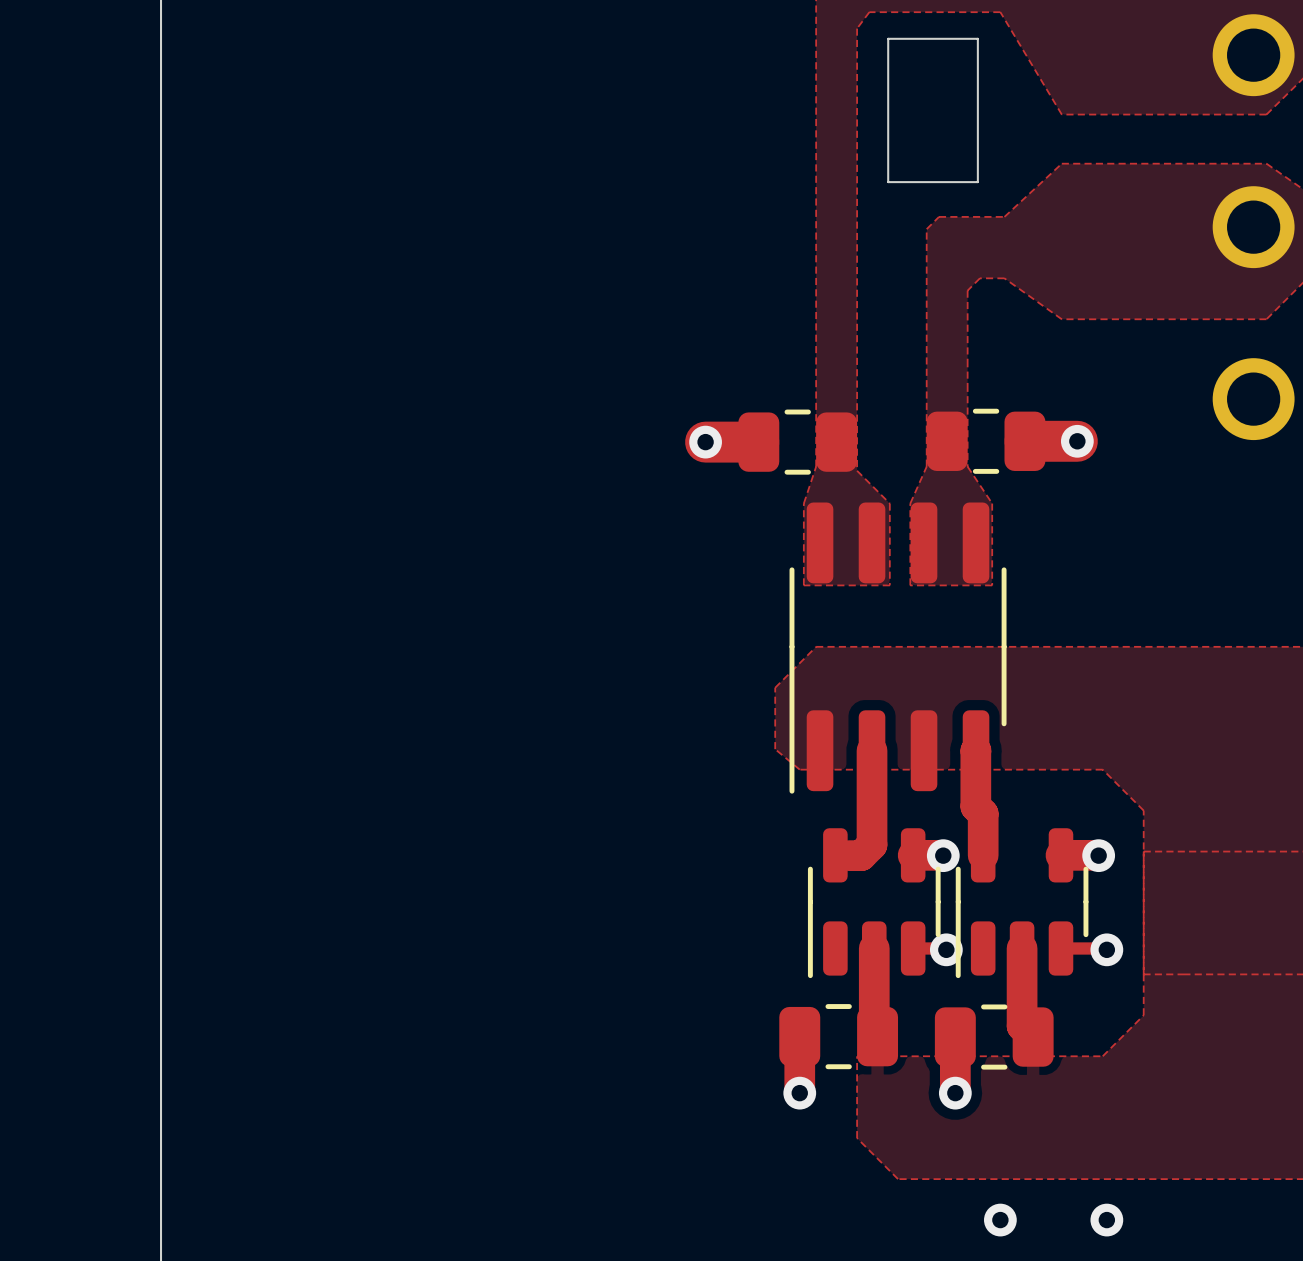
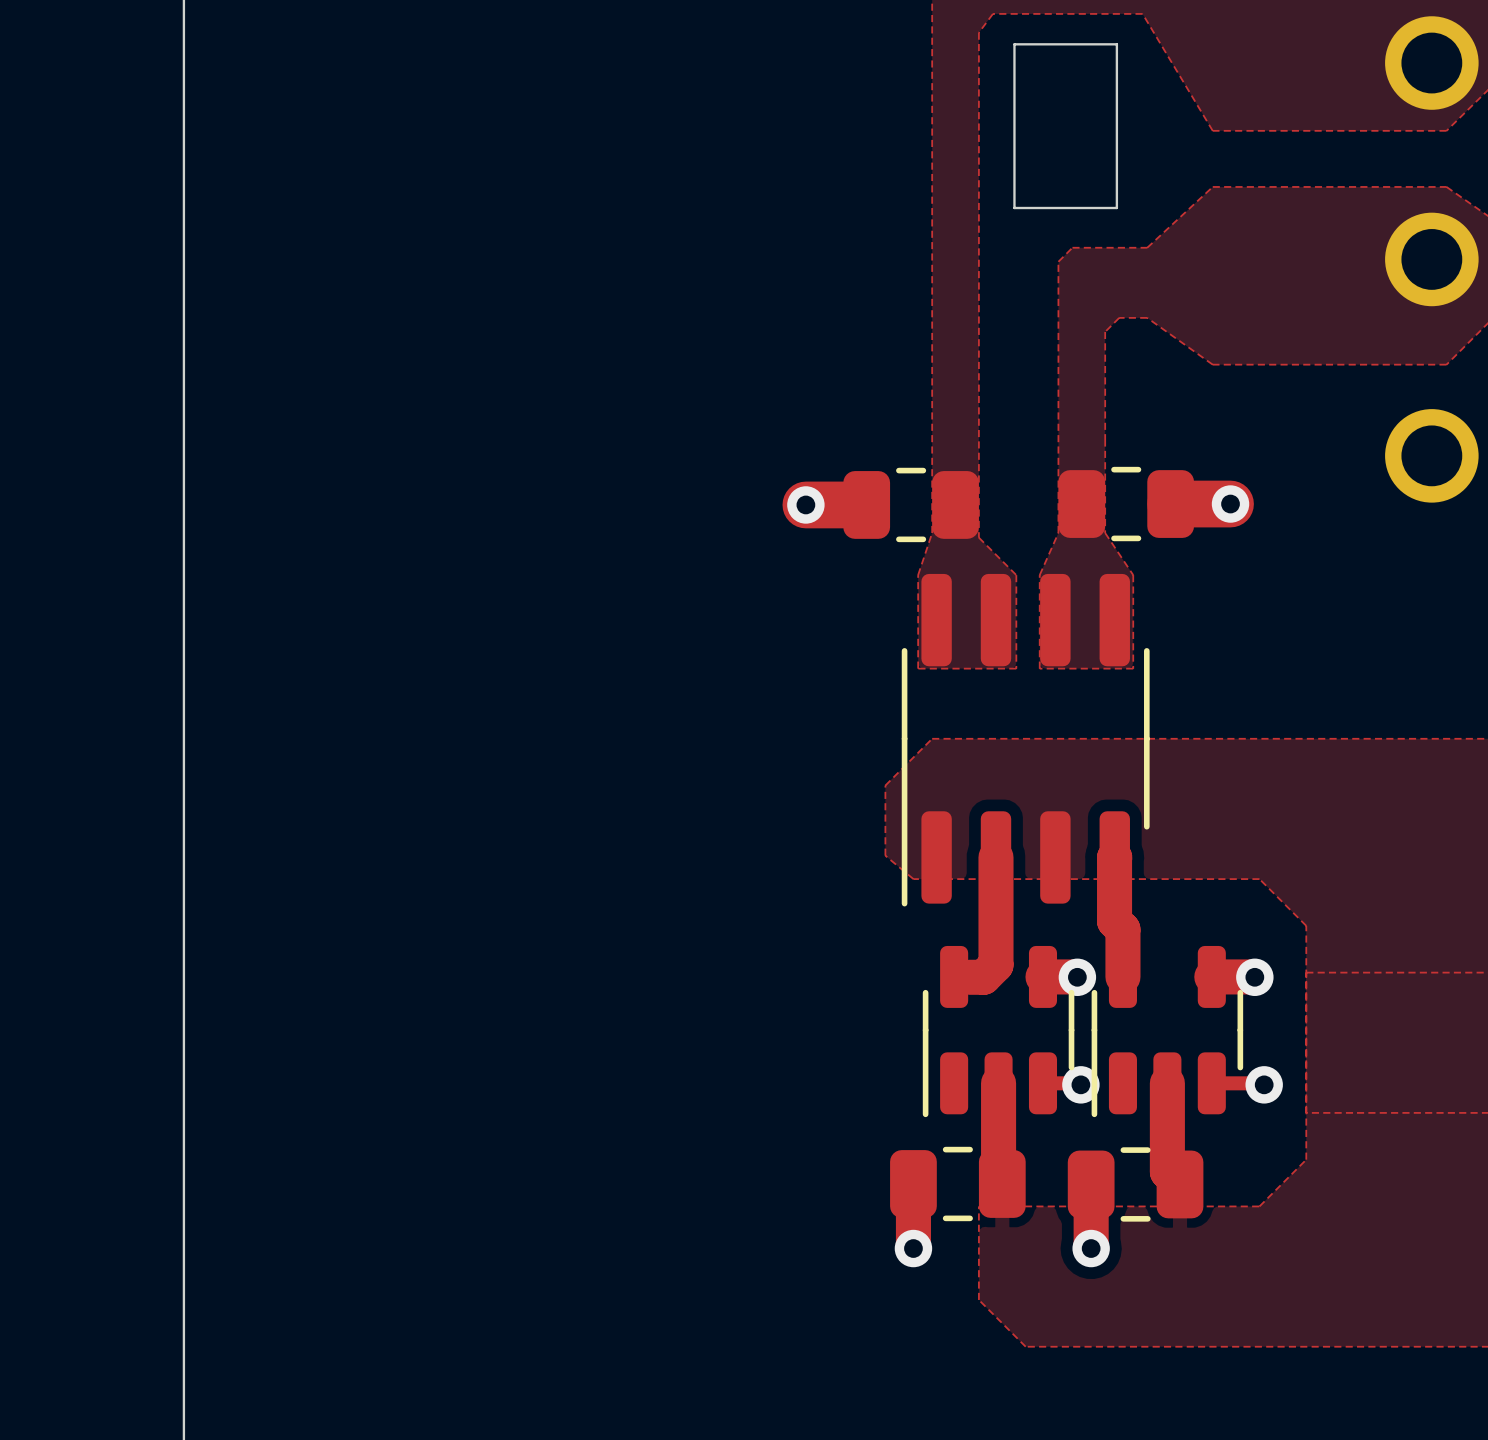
via: (1000, 1220) -> none
via: (1106, 1220) -> none

